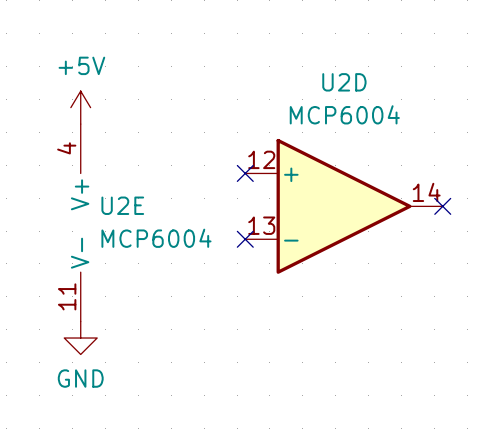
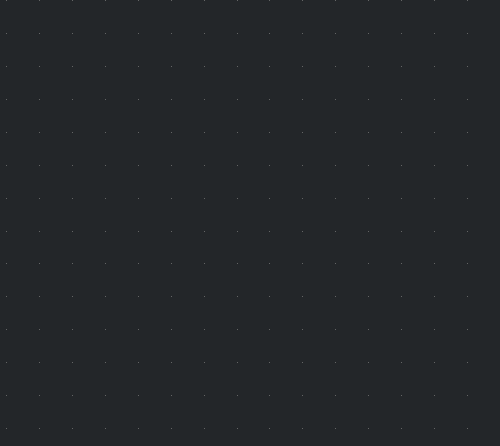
power symbol: +5V (80, 107) -> none
no-connect mark: (245, 173) -> none
U2D: MCP6004 (344, 206) -> none
no-connect mark: (442, 206) -> none
U2E: MCP6004 (80, 222) -> none
no-connect mark: (245, 239) -> none
power symbol: GND (80, 338) -> none

